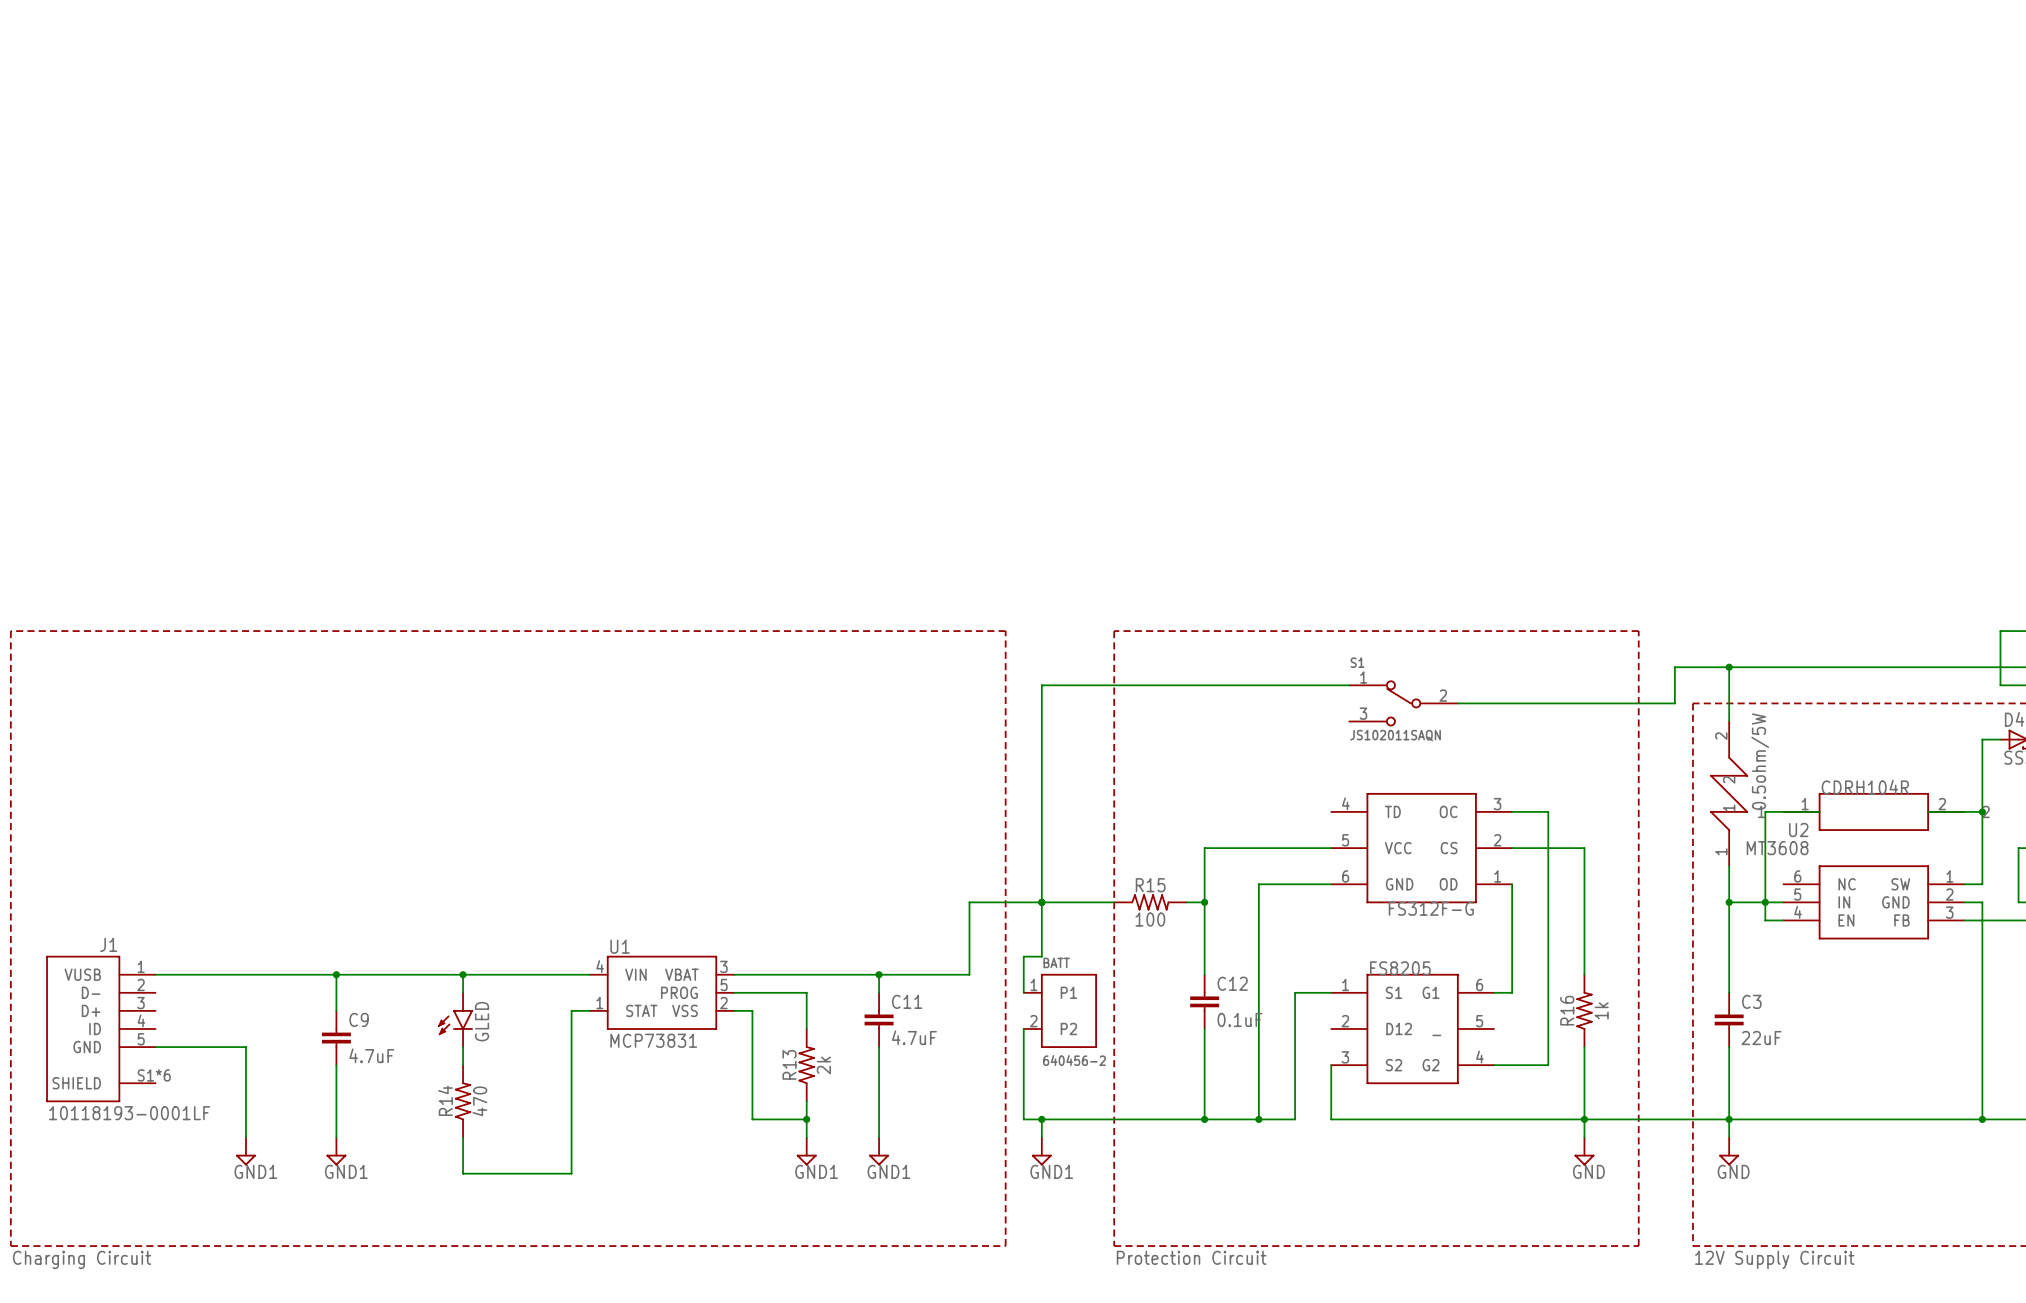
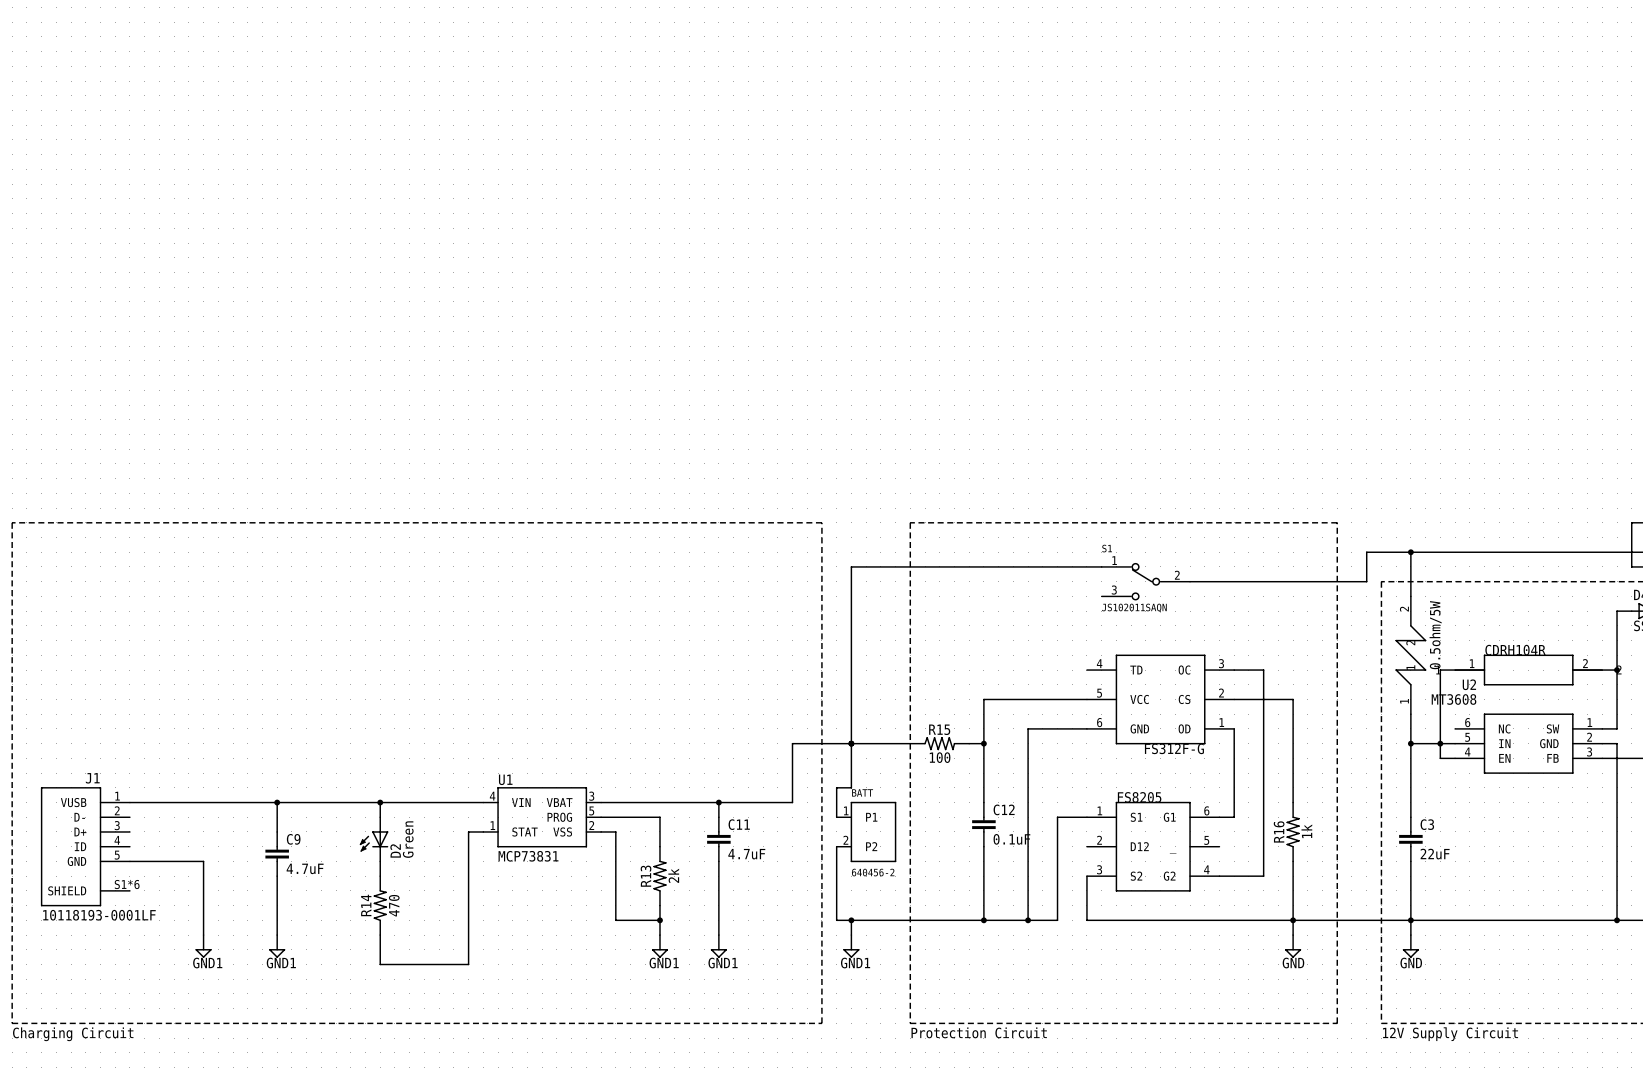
GLED: (455, 1019) -> none
D2: none -> Green (374, 839)

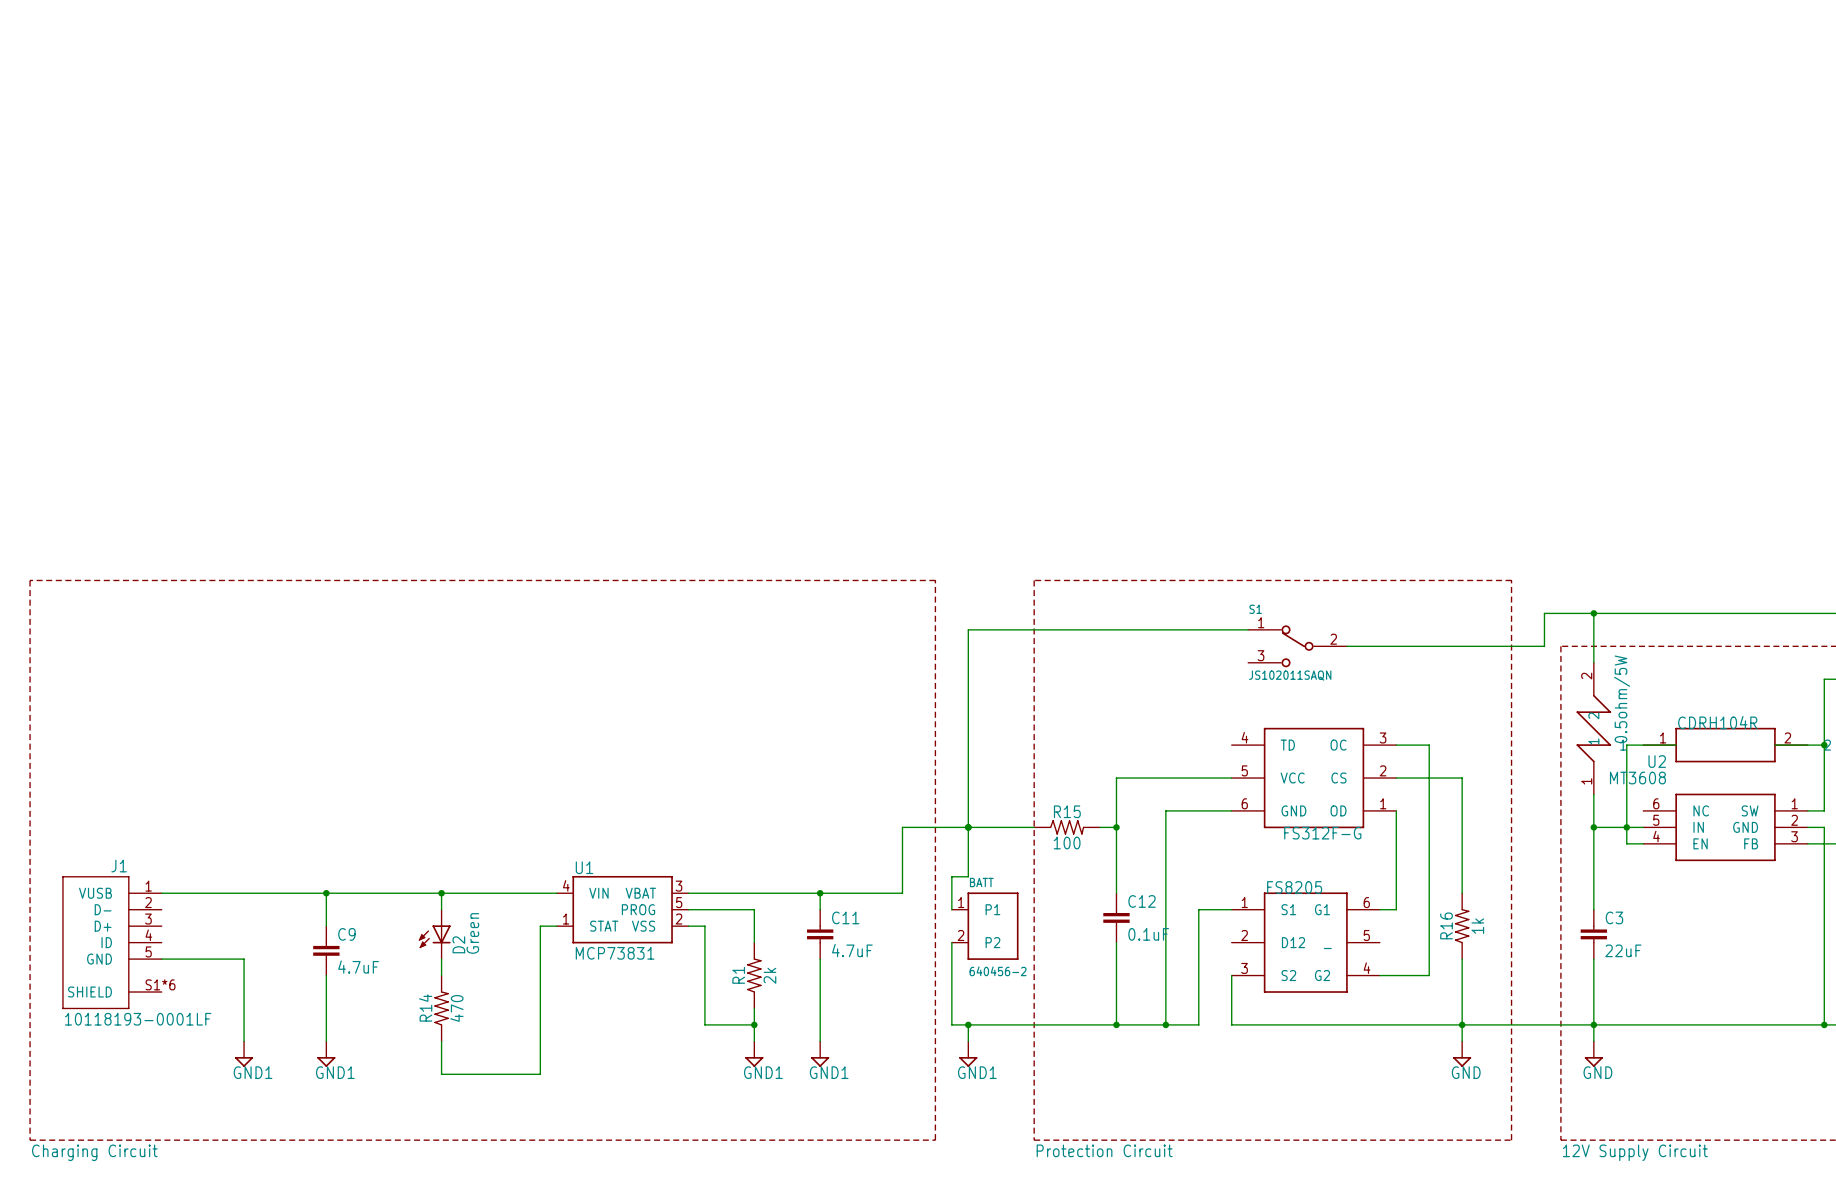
R13 name: R13 (646, 876) -> R1 (738, 975)

